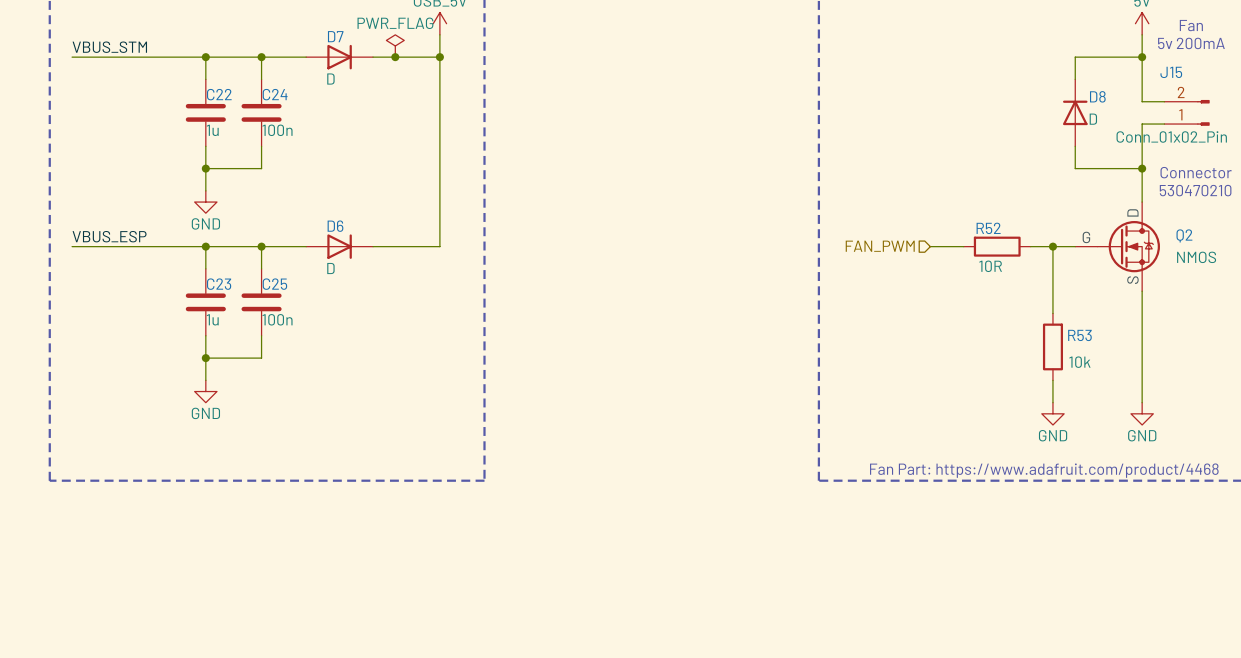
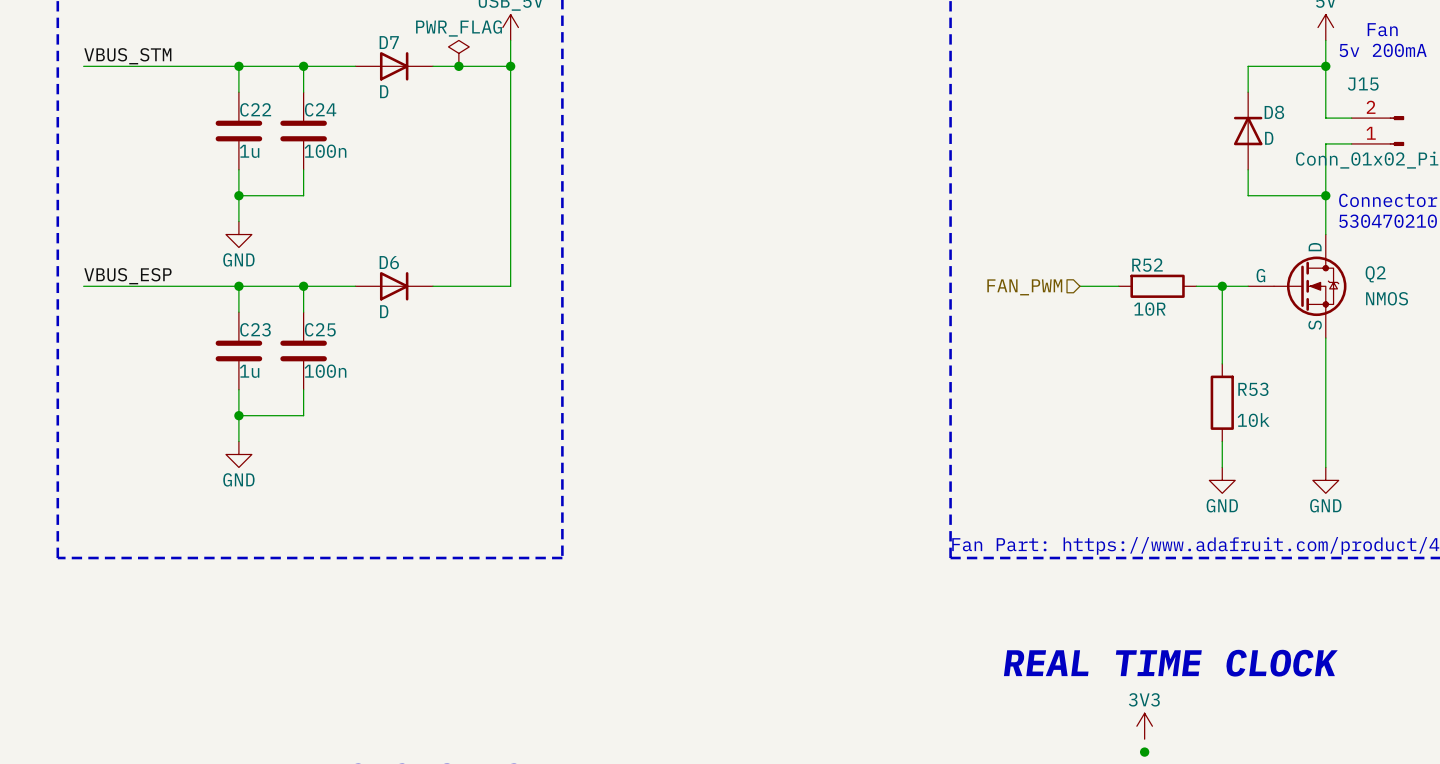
text: none -> REAL TIME CLOCK (1170, 663)
power symbol: none -> 3V3 (1144, 726)
junction: none -> (1144, 752)

